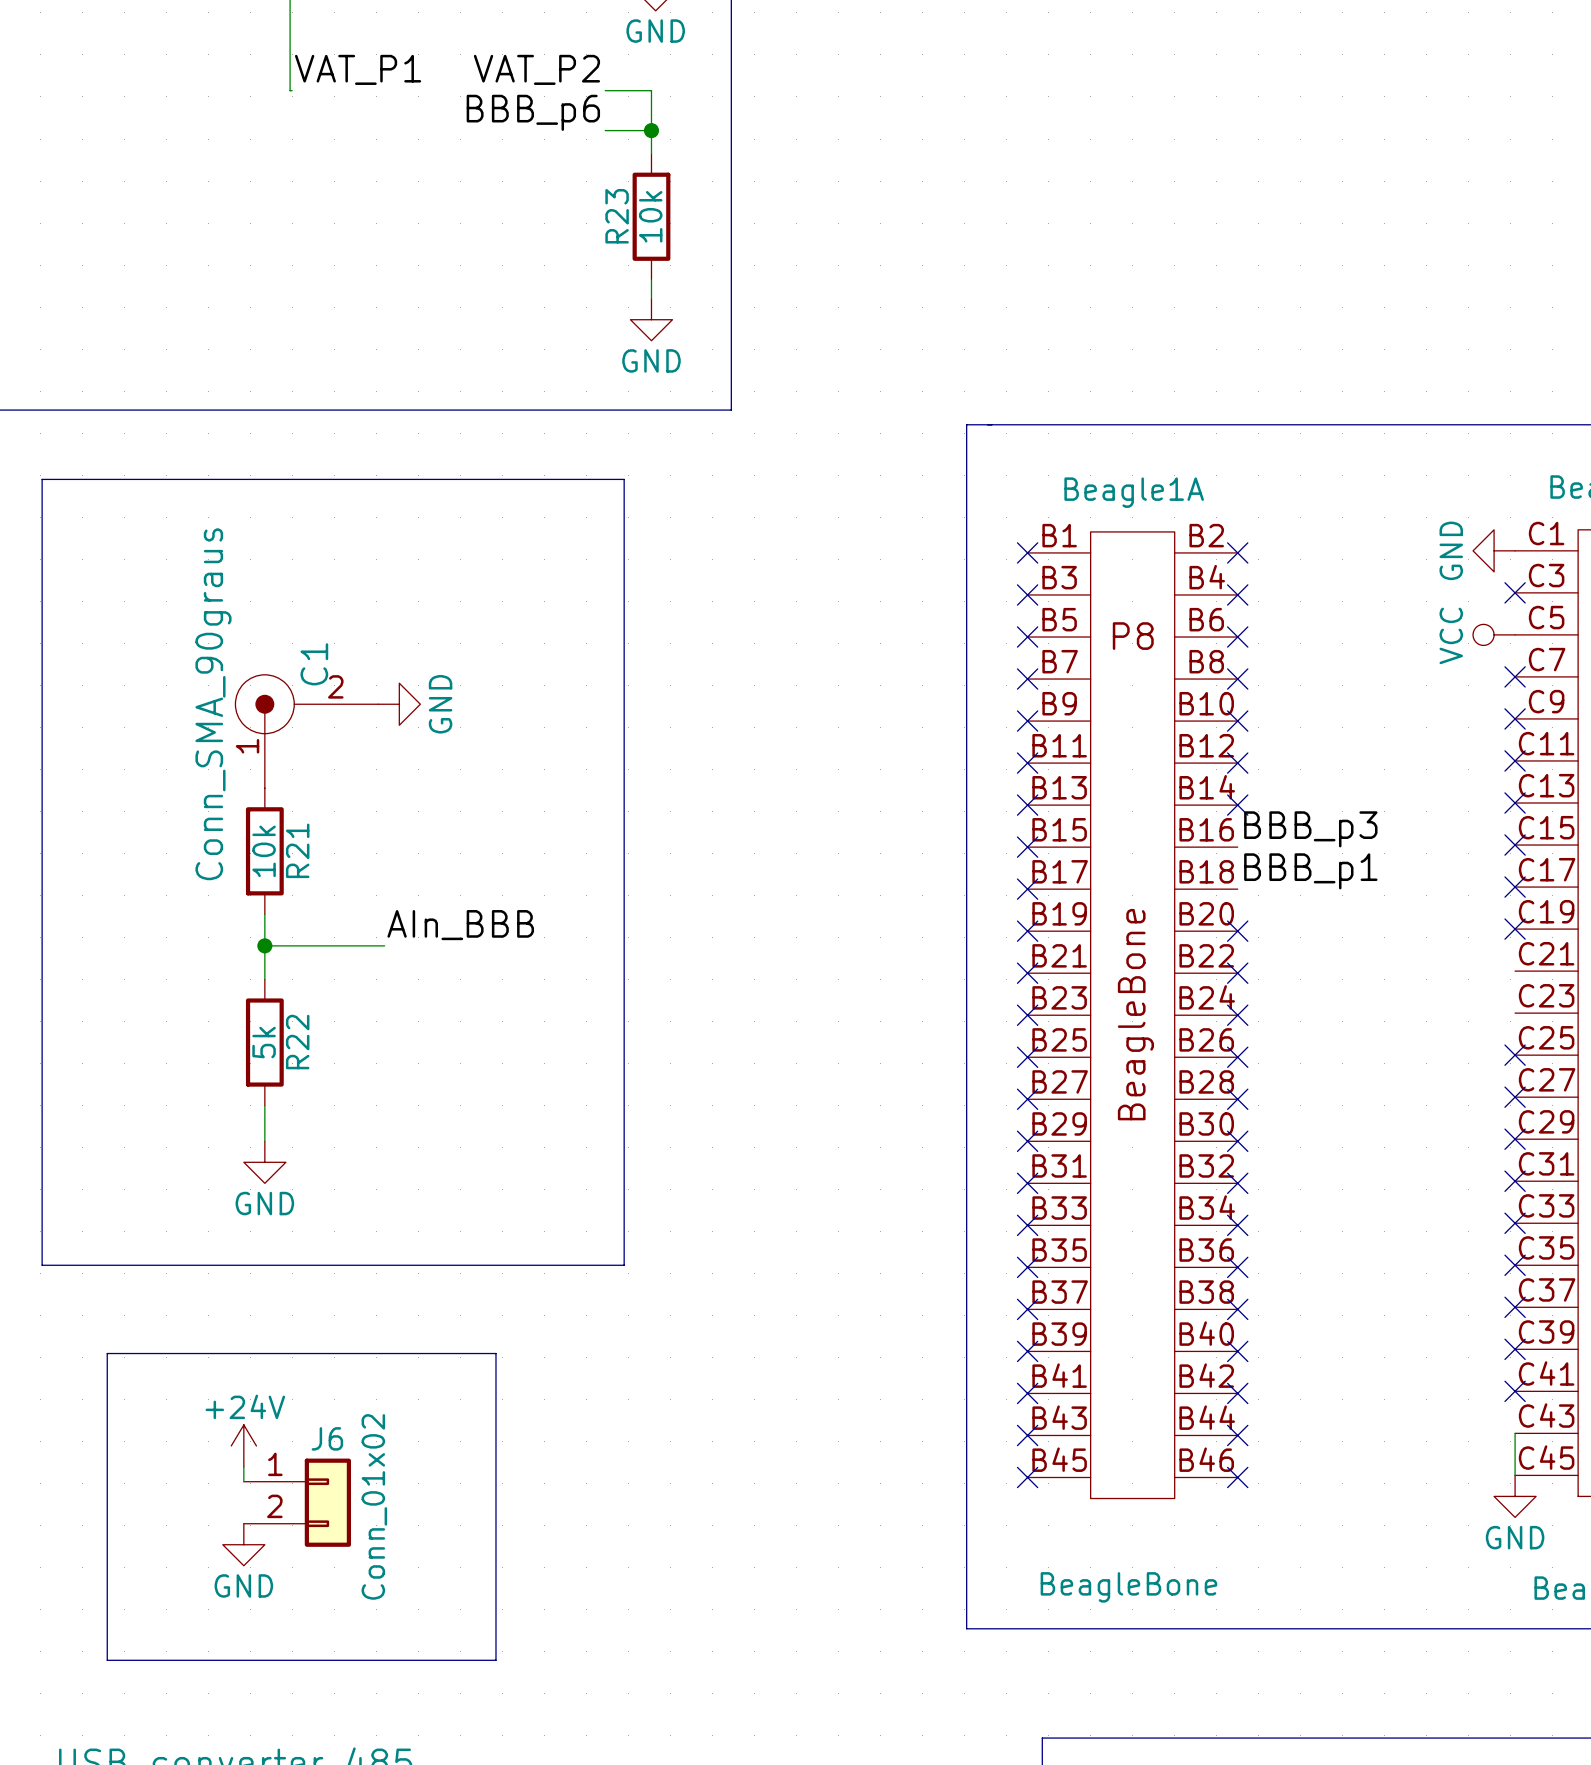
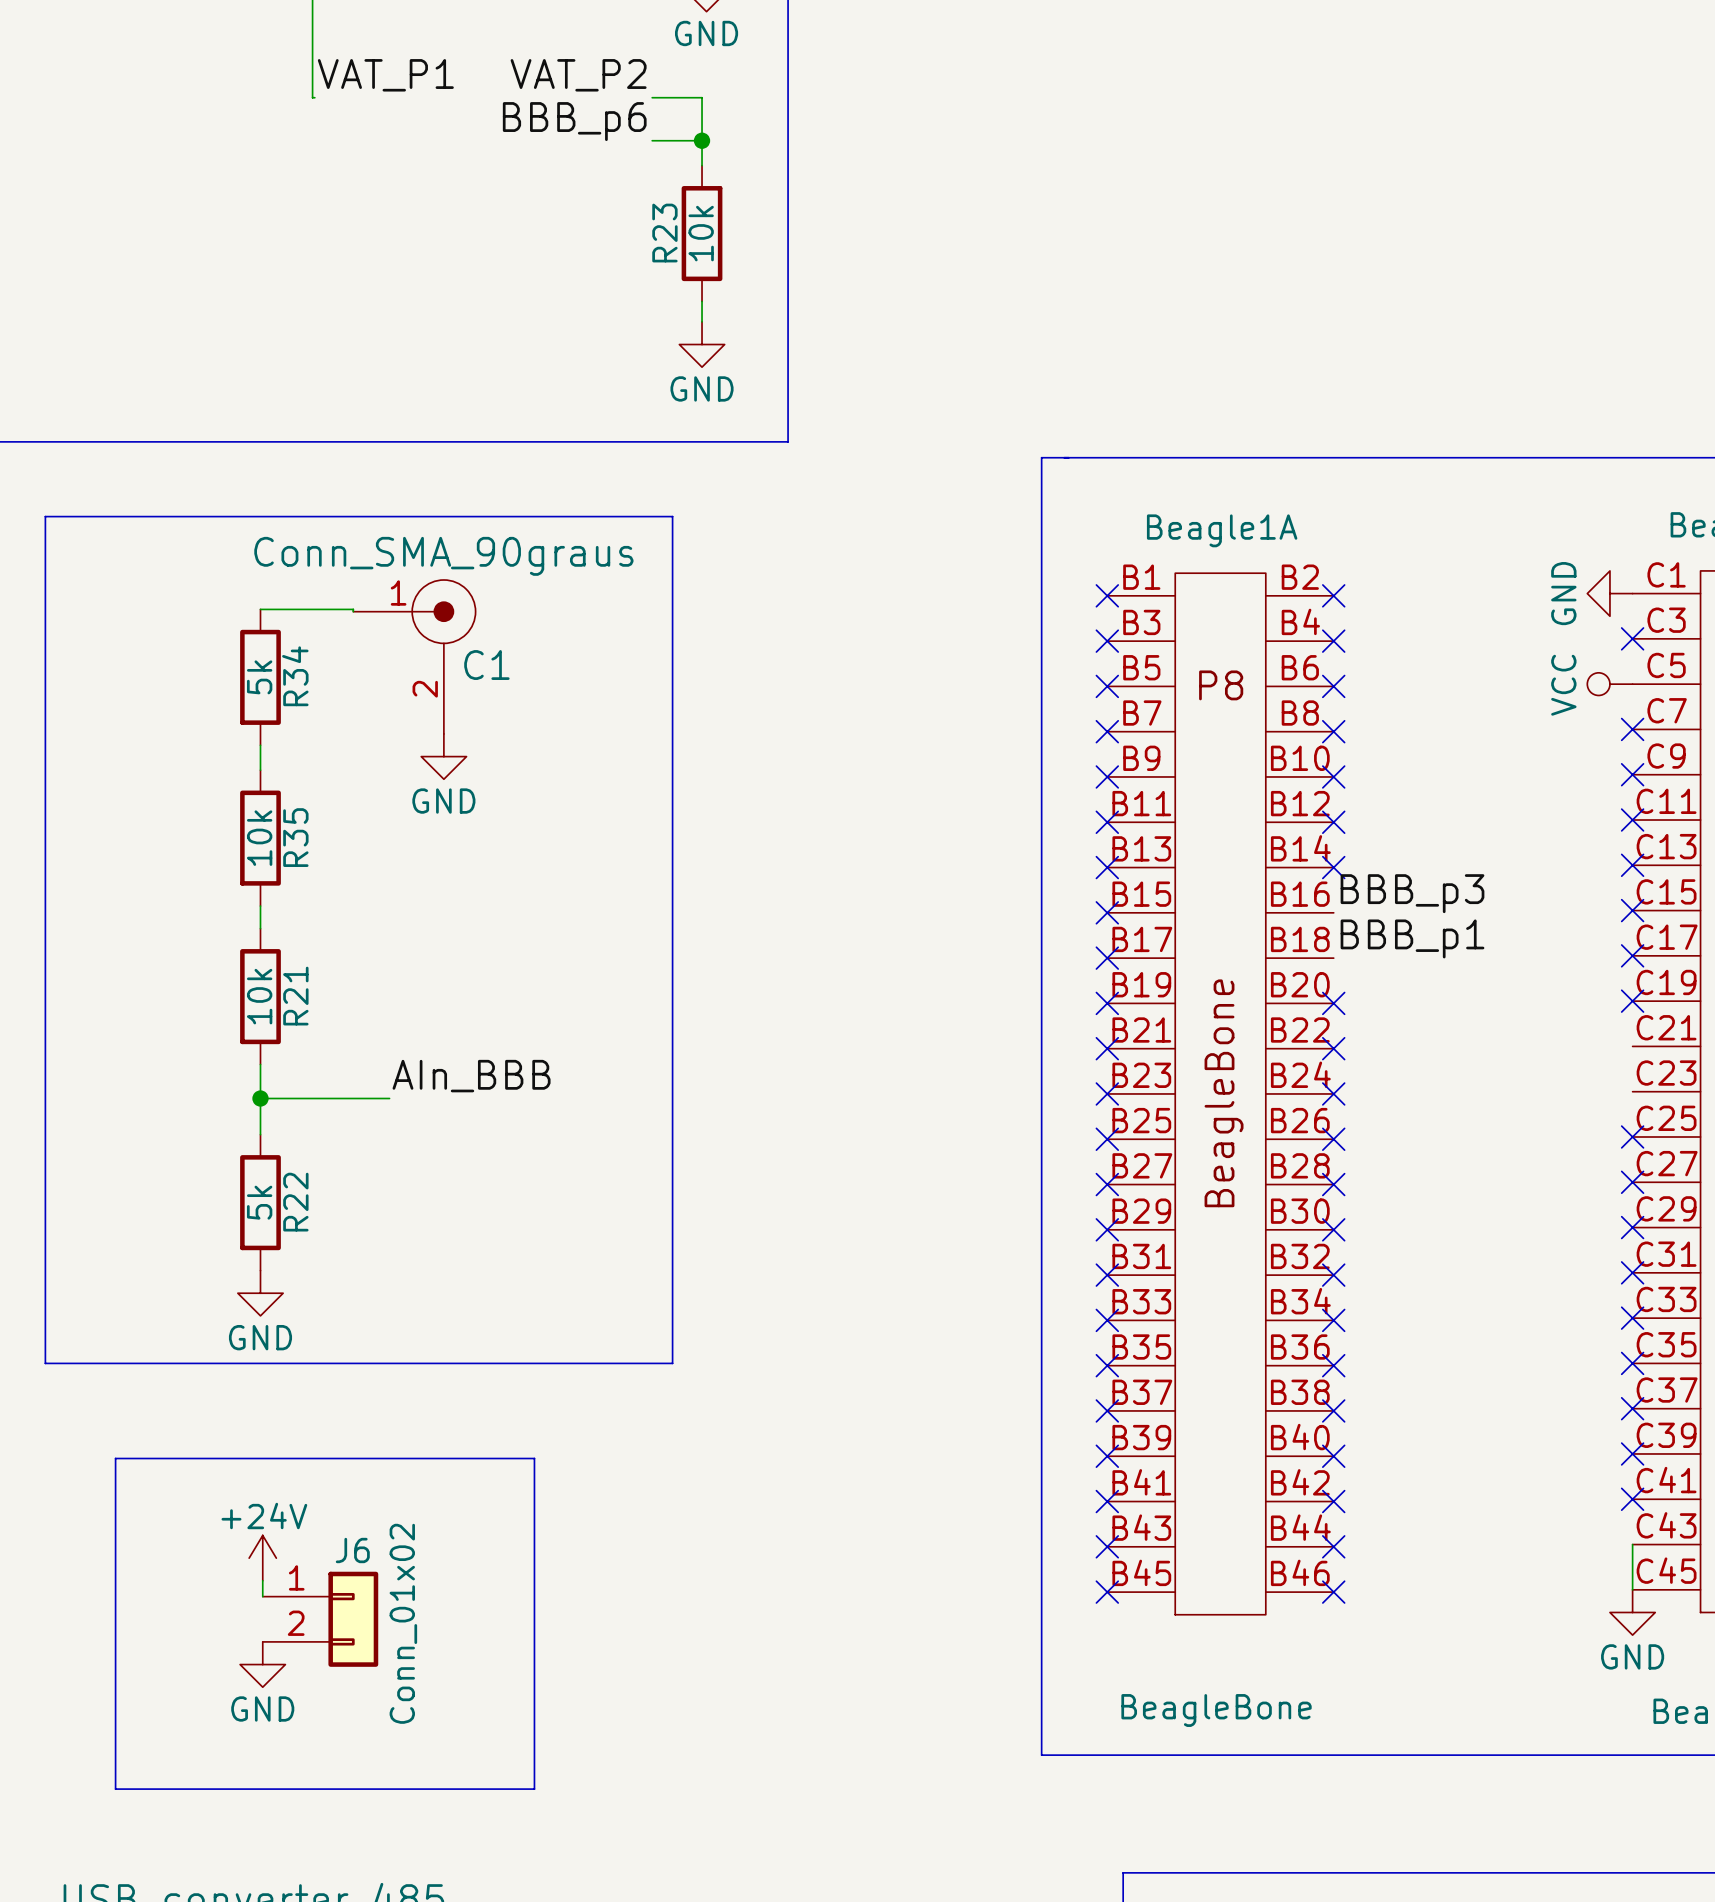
wire: none -> (260, 609) (353, 609) (353, 611)
R34: none -> 5k (260, 677)
wire: none -> (260, 745) (260, 770)
C1 rotation: 0° (264, 704) -> 90° clockwise (443, 611)
power symbol rotation: 0° (399, 704) -> 90° clockwise (443, 756)
C1 position: (306, 731) -> (414, 656)
R35: none -> 10k (260, 838)
wire: none -> (260, 906) (260, 928)
R21 position: (264, 851) -> (260, 996)
wire: (264, 914) (264, 979) -> (260, 1064) (260, 1134)
label position: AIn_BBB (460, 925) -> AIn_BBB (471, 1076)
wire: (264, 945) (384, 945) -> (260, 1098) (389, 1098)
junction position: (264, 945) -> (260, 1098)
R22 position: (264, 1042) -> (260, 1202)
power symbol position: GND (264, 1162) -> GND (260, 1293)

